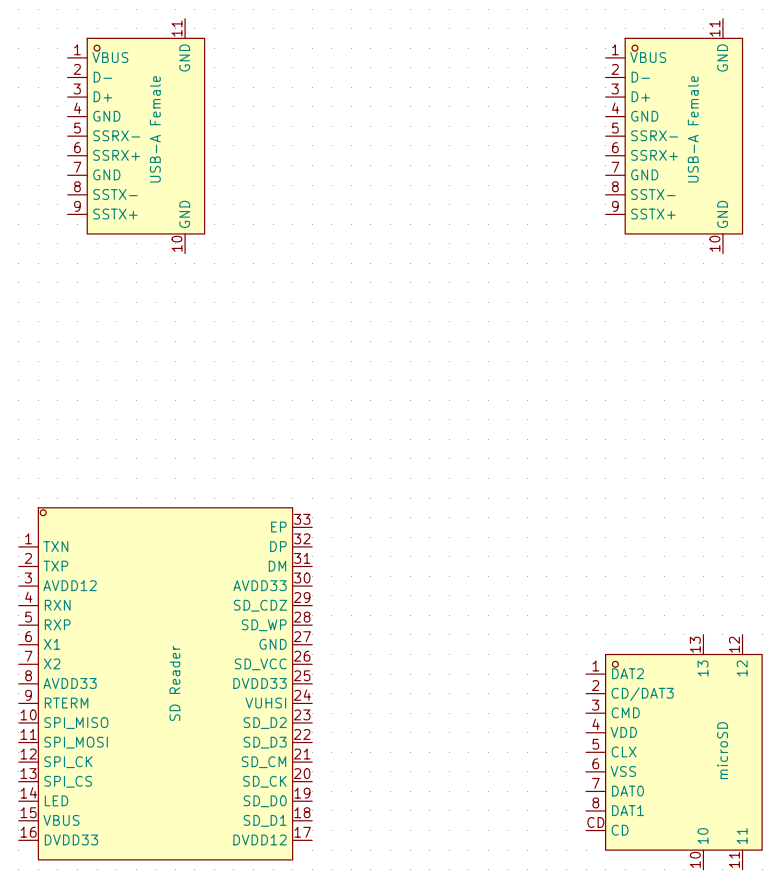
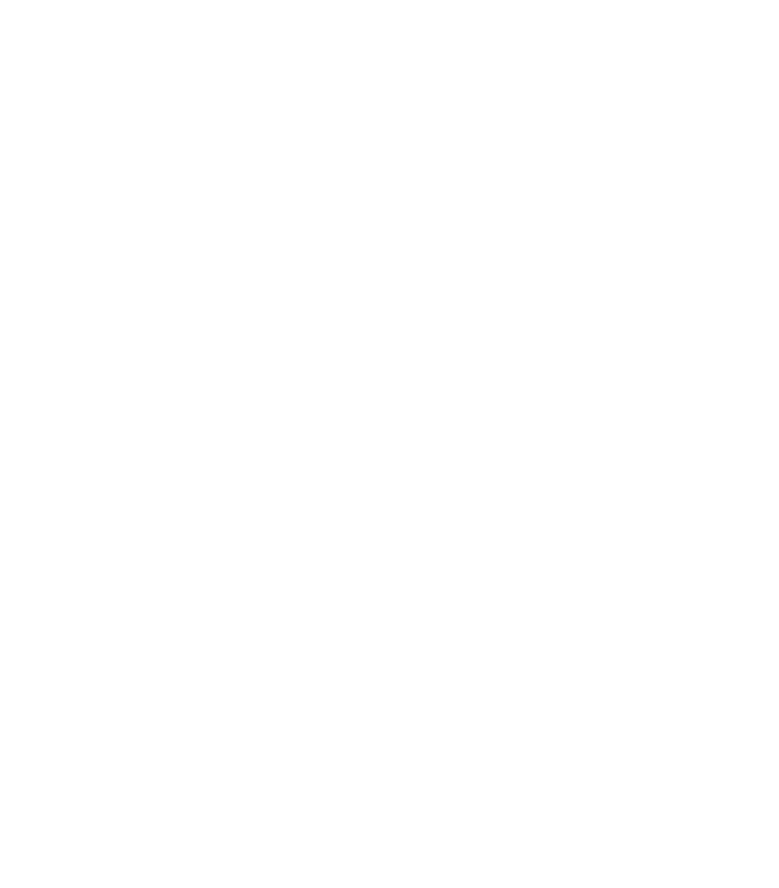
part: USB-A Female (136, 136) -> none
part: USB-A Female (674, 136) -> none
part: SD Reader (165, 683) -> none
microSD: (674, 752) -> none

